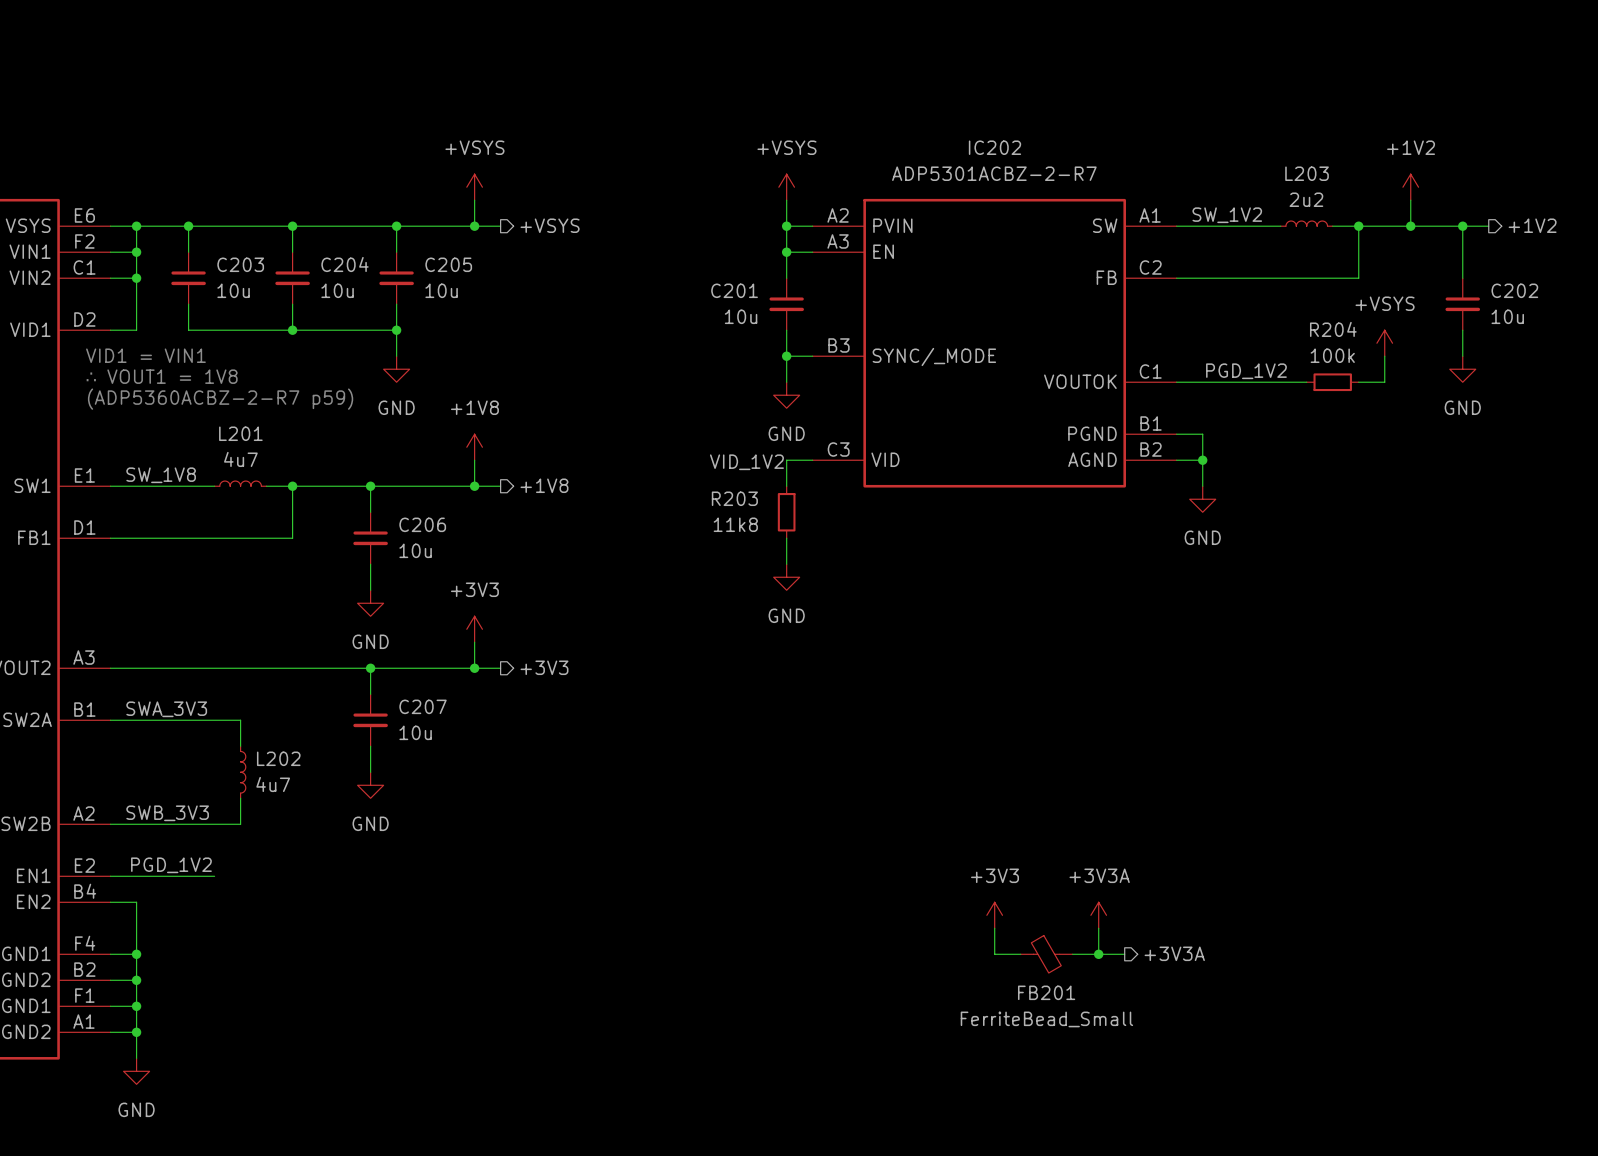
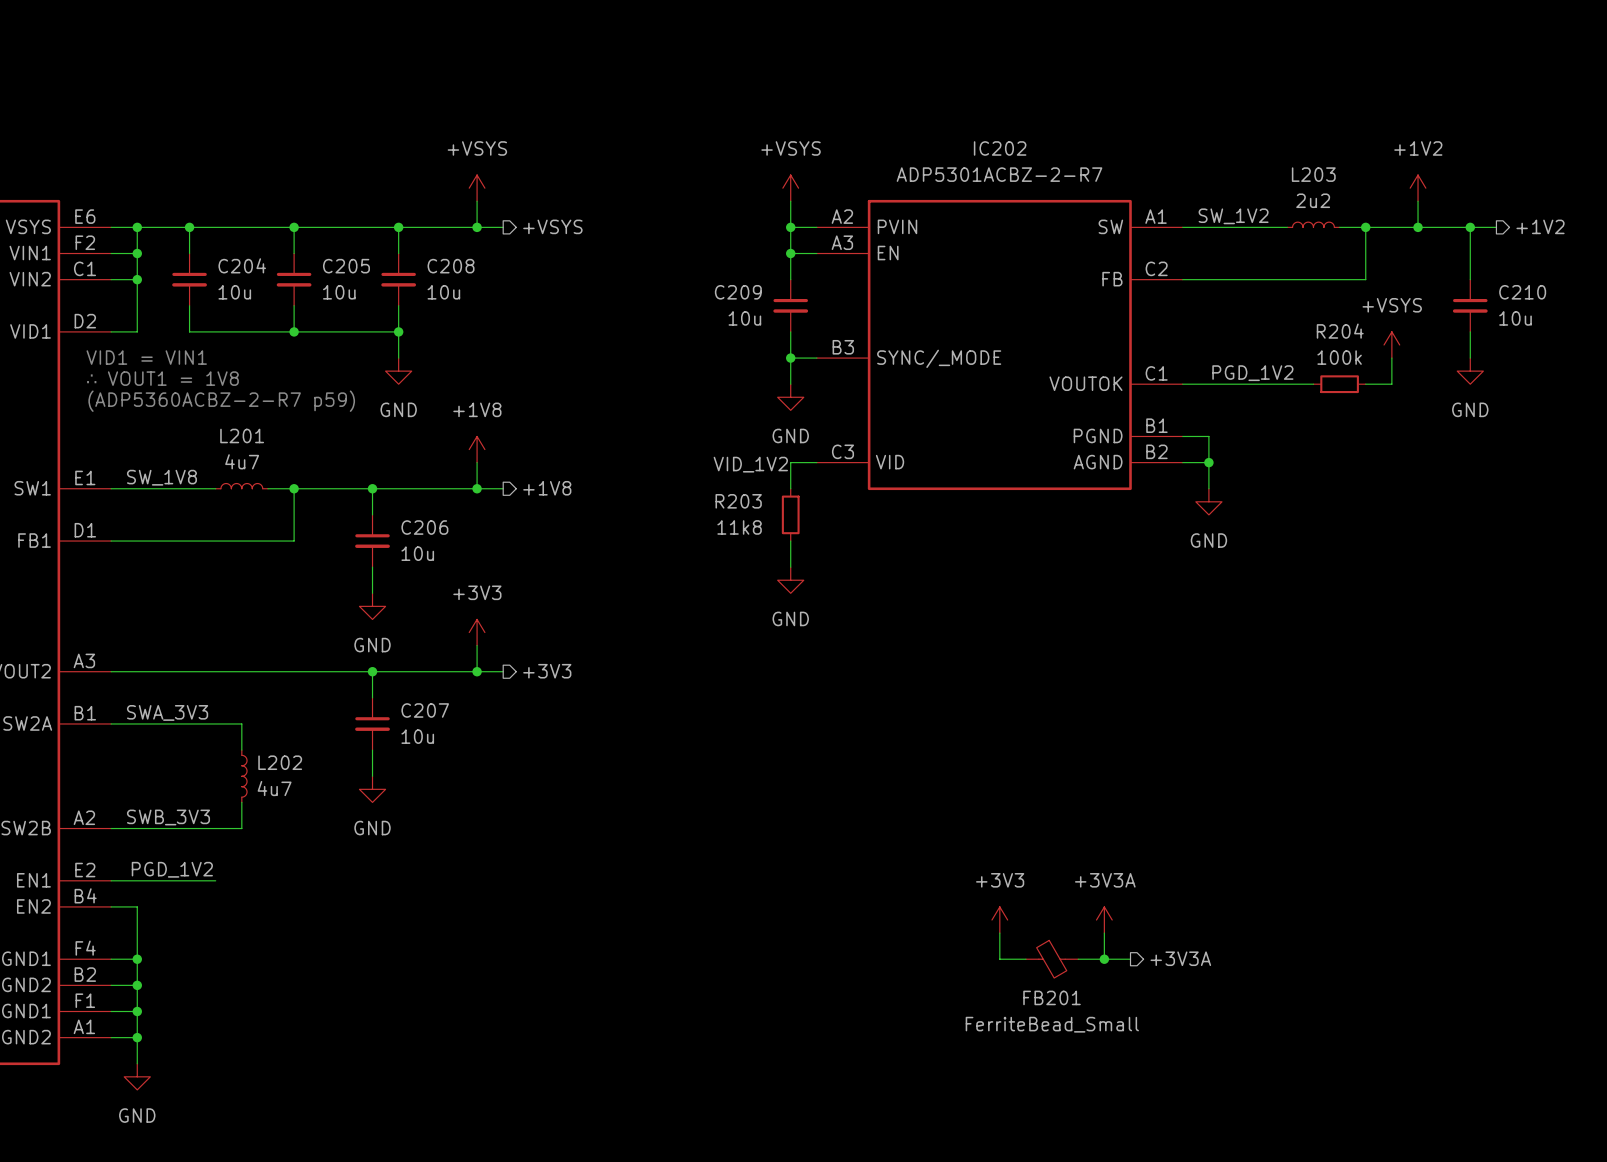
C203 name: C203 (240, 264) -> C204 (242, 265)
C204 name: C204 (345, 264) -> C205 (346, 266)
C205 name: C205 (448, 264) -> C208 (451, 266)
C201 name: C201 (734, 290) -> C209 (738, 292)
C202 name: C202 (1514, 290) -> C210 (1522, 292)

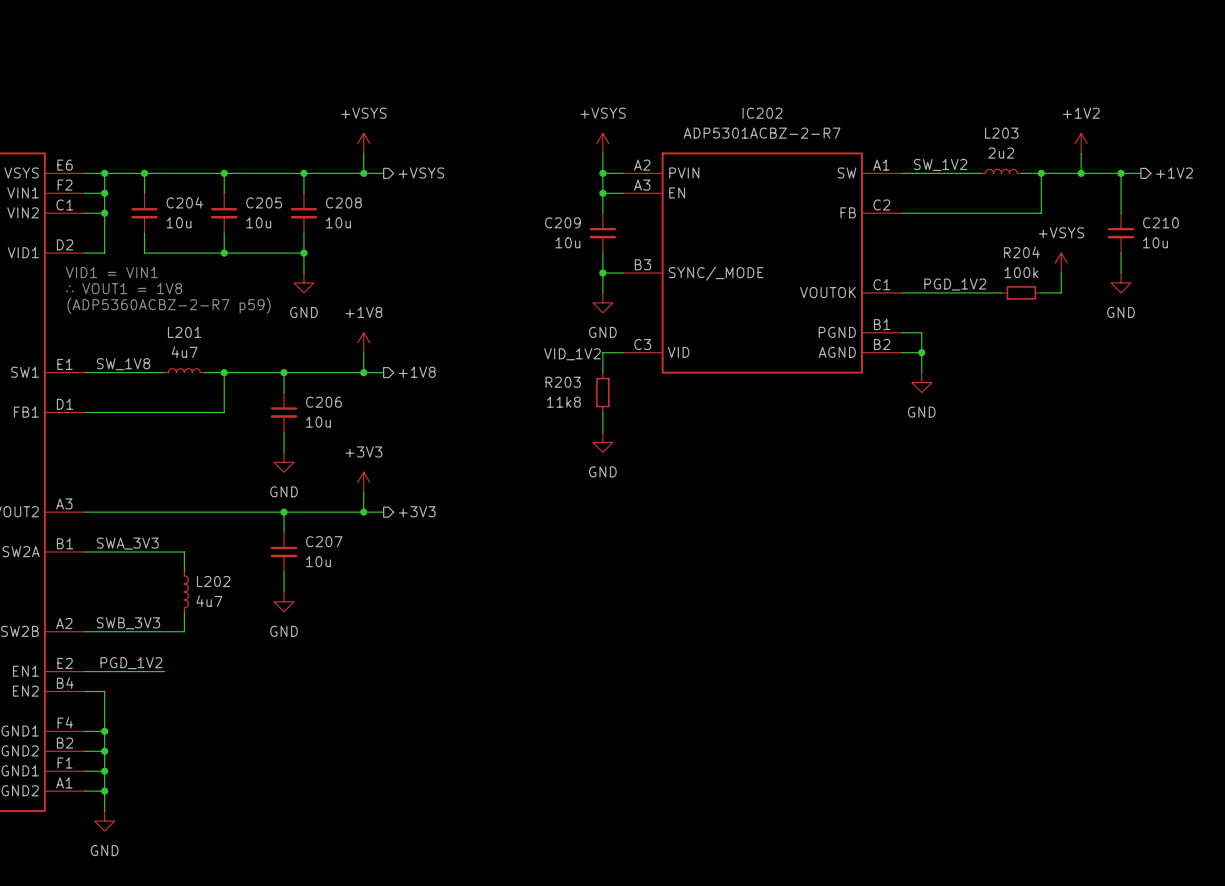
power symbol: +3V3 (999, 920) -> none
power symbol: +3V3A (1104, 920) -> none
wire: (999, 933) (999, 959) (1025, 959) -> none
wire: (1104, 933) (1104, 959) -> none
hierarchical label: +3V3A (1180, 958) -> none
FB201: FerriteBead_Small (1052, 959) -> none
wire: (1078, 959) (1130, 959) -> none
junction: (1104, 959) -> none

